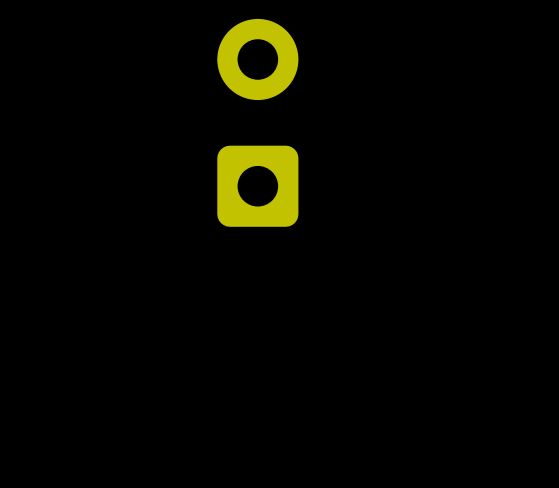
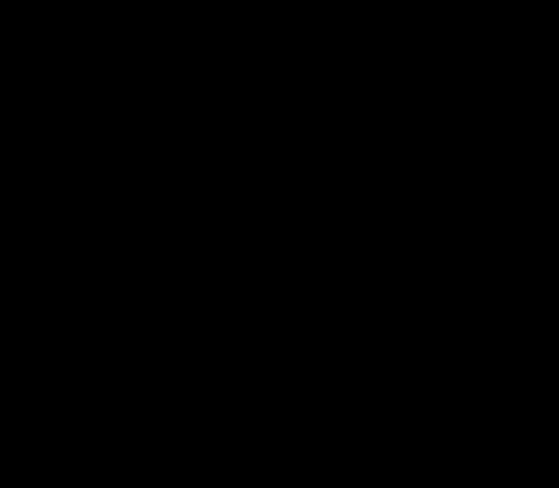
part: (257, 122) -> none

